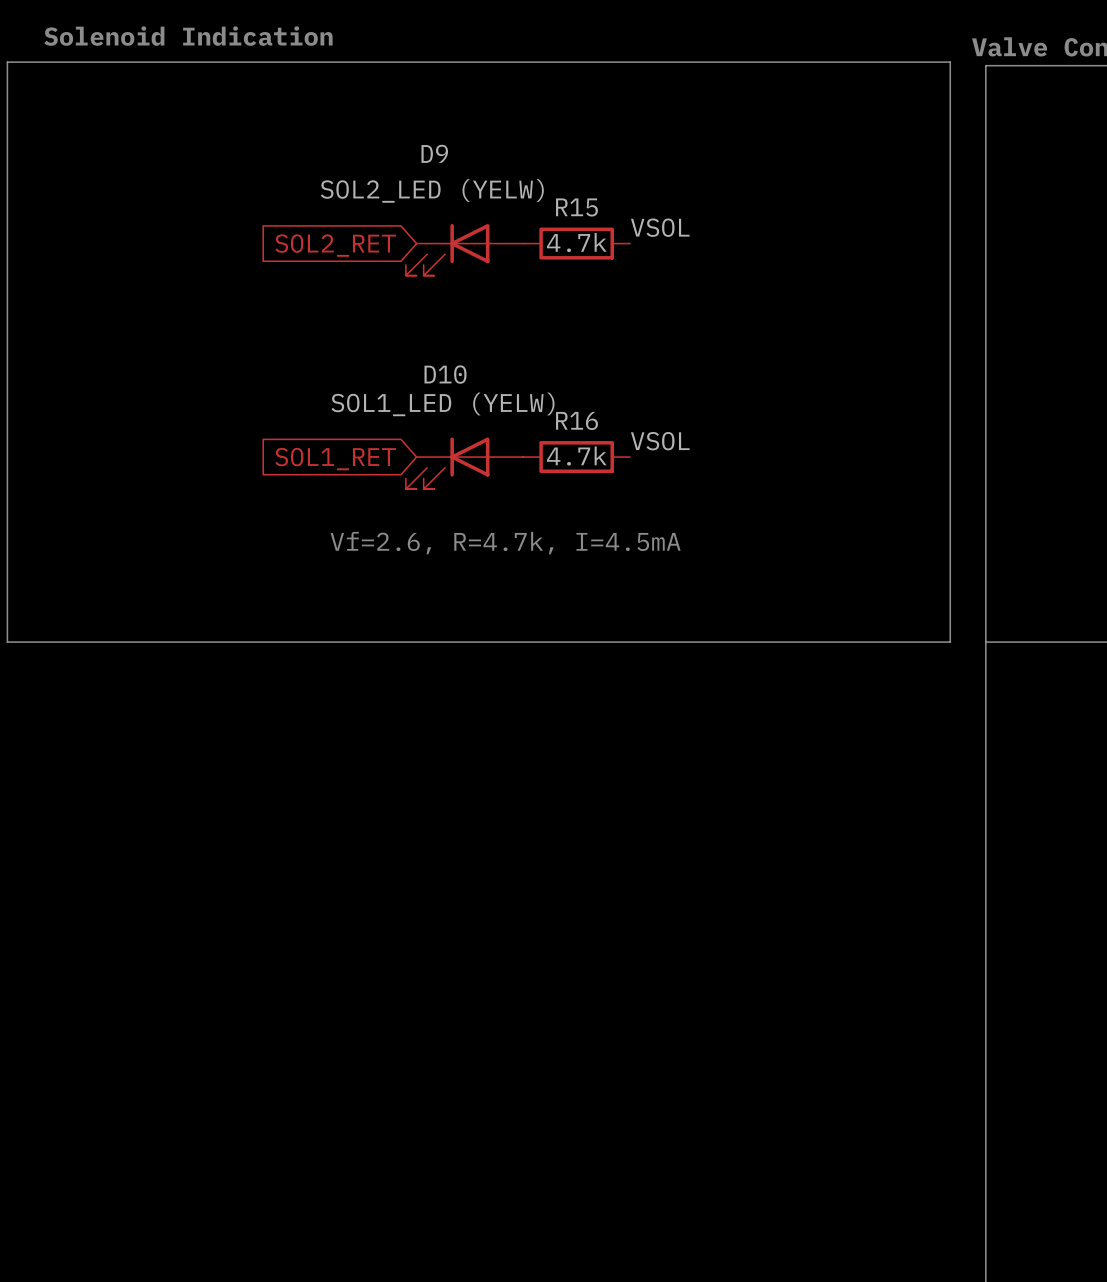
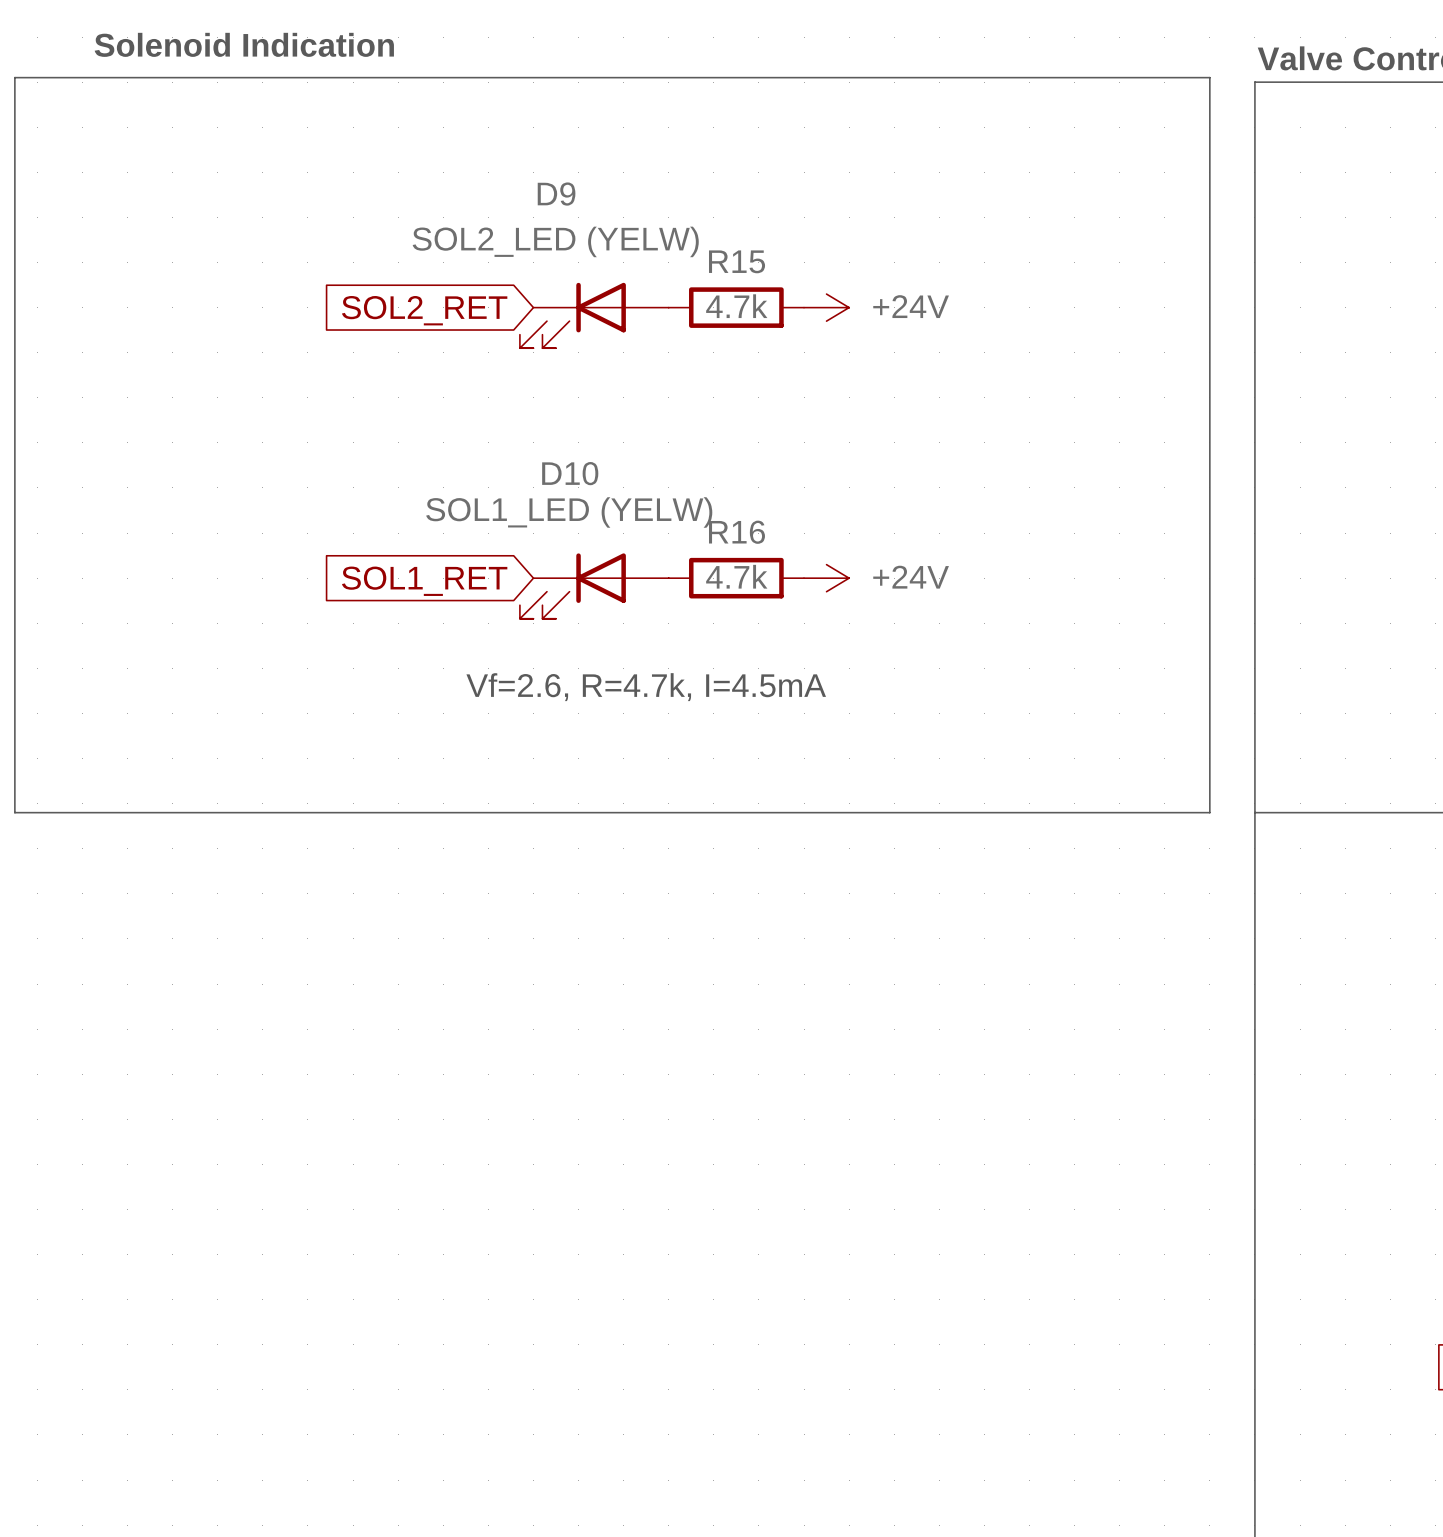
label: VSOL (660, 227) -> none
power symbol: none -> +24V (826, 307)
label: VSOL (660, 441) -> none
power symbol: none -> +24V (826, 578)

